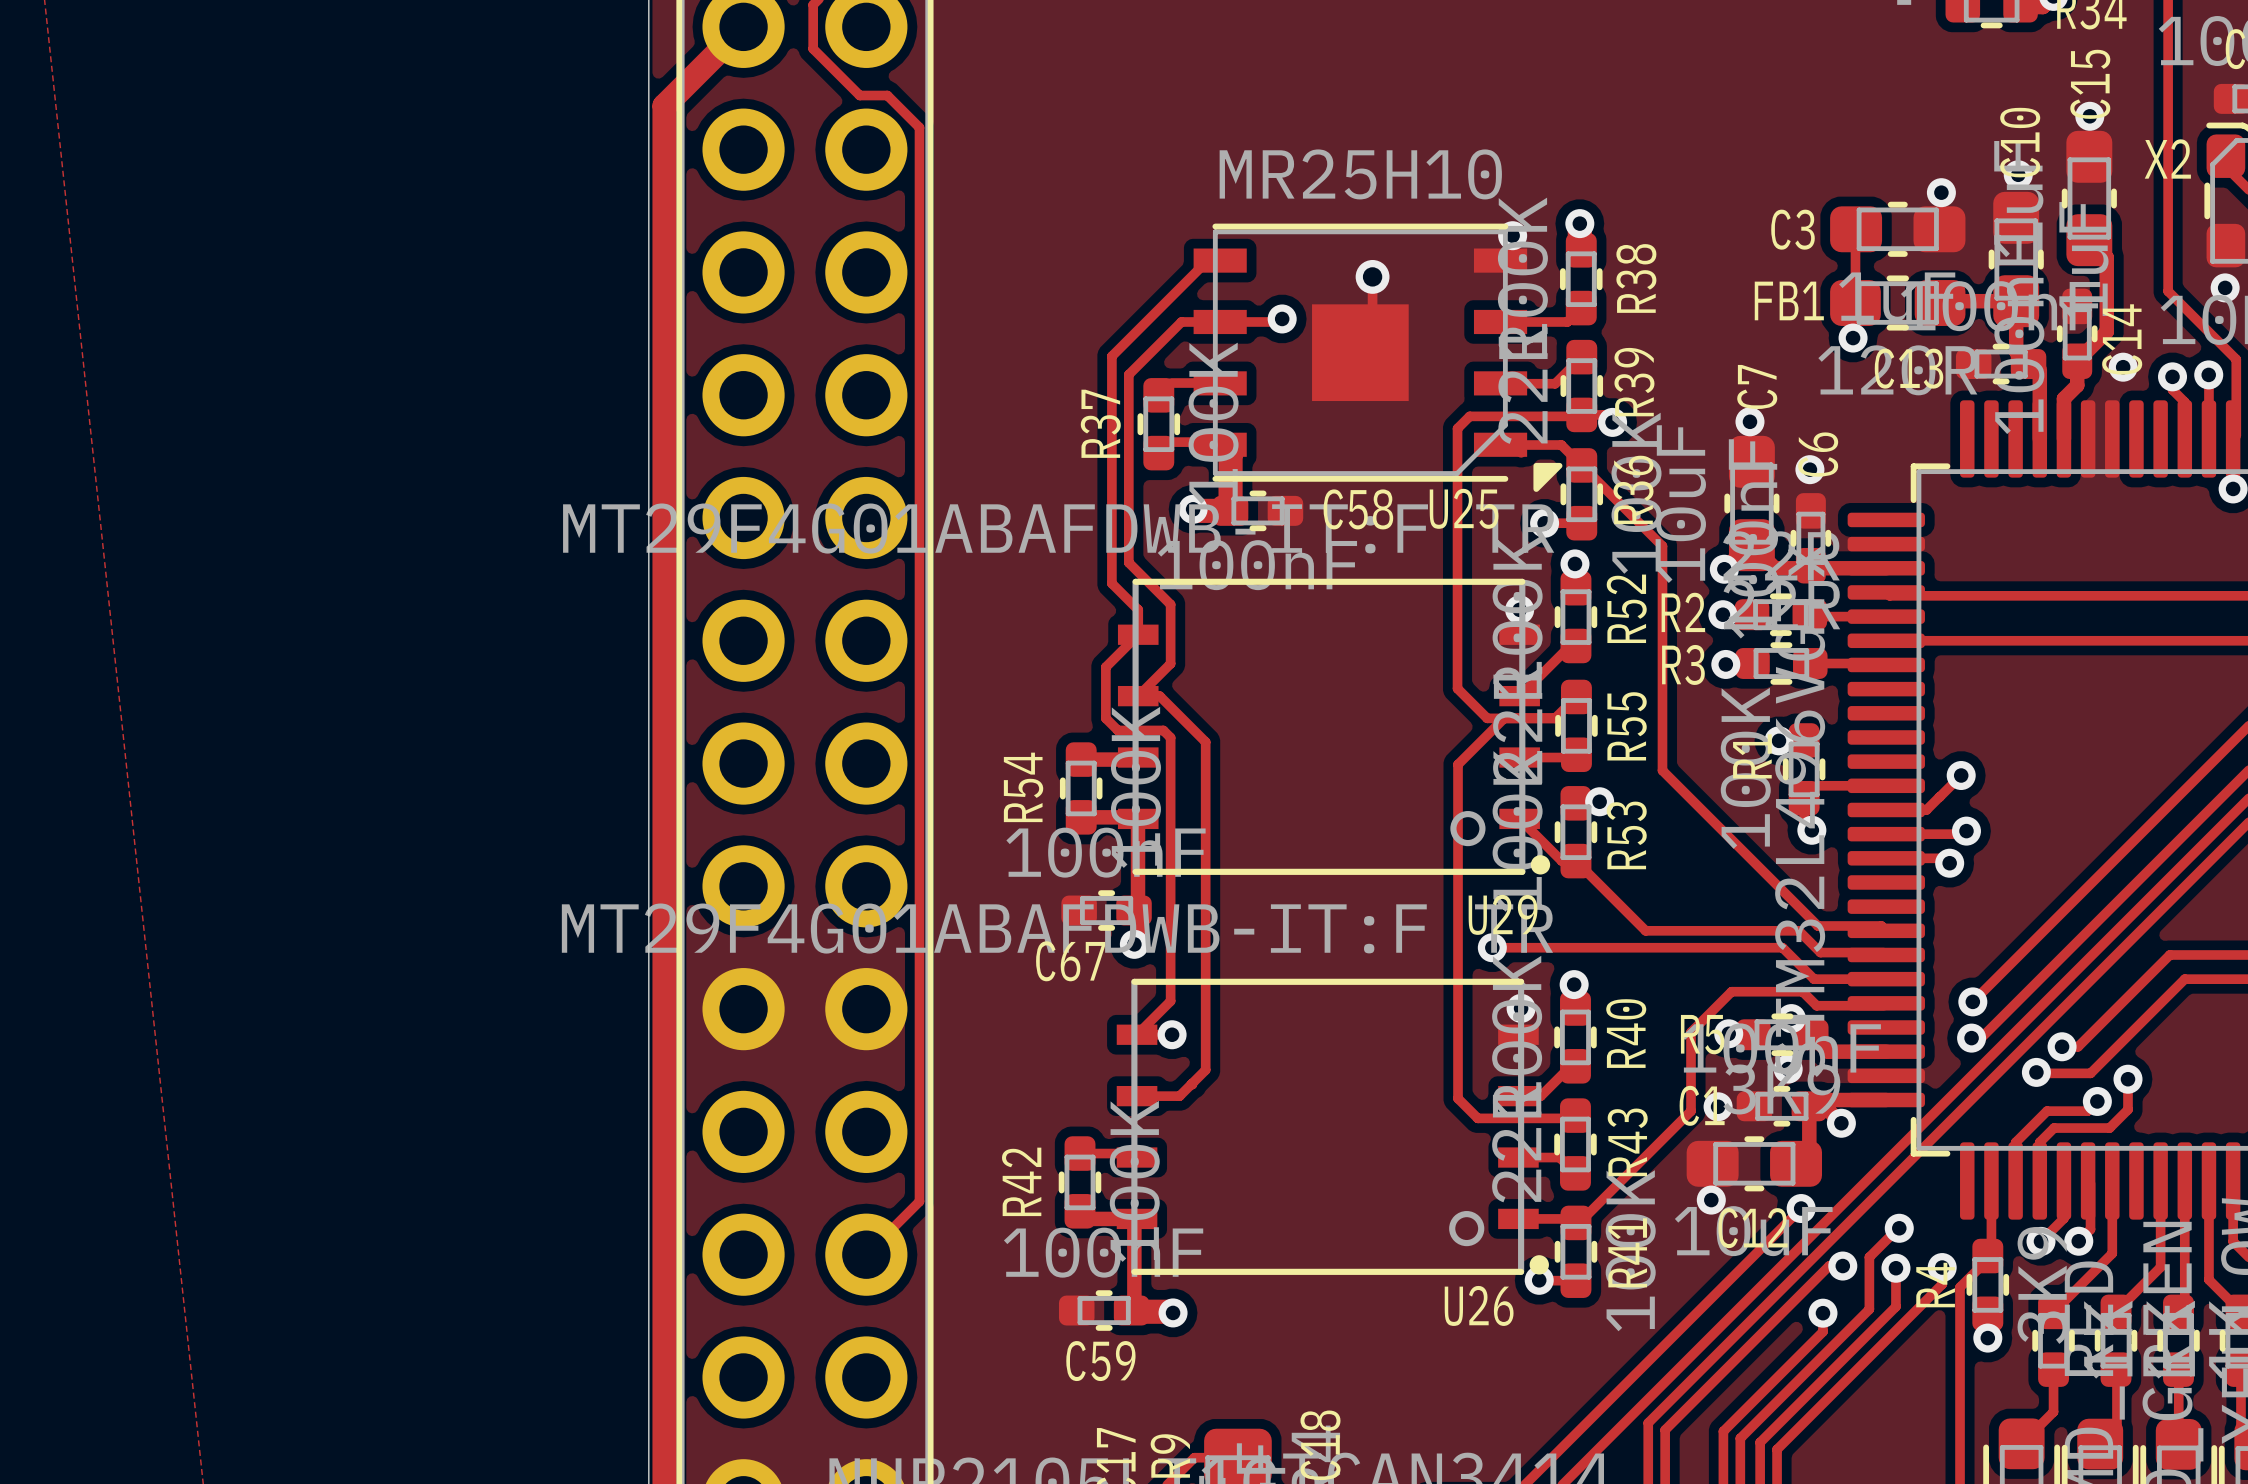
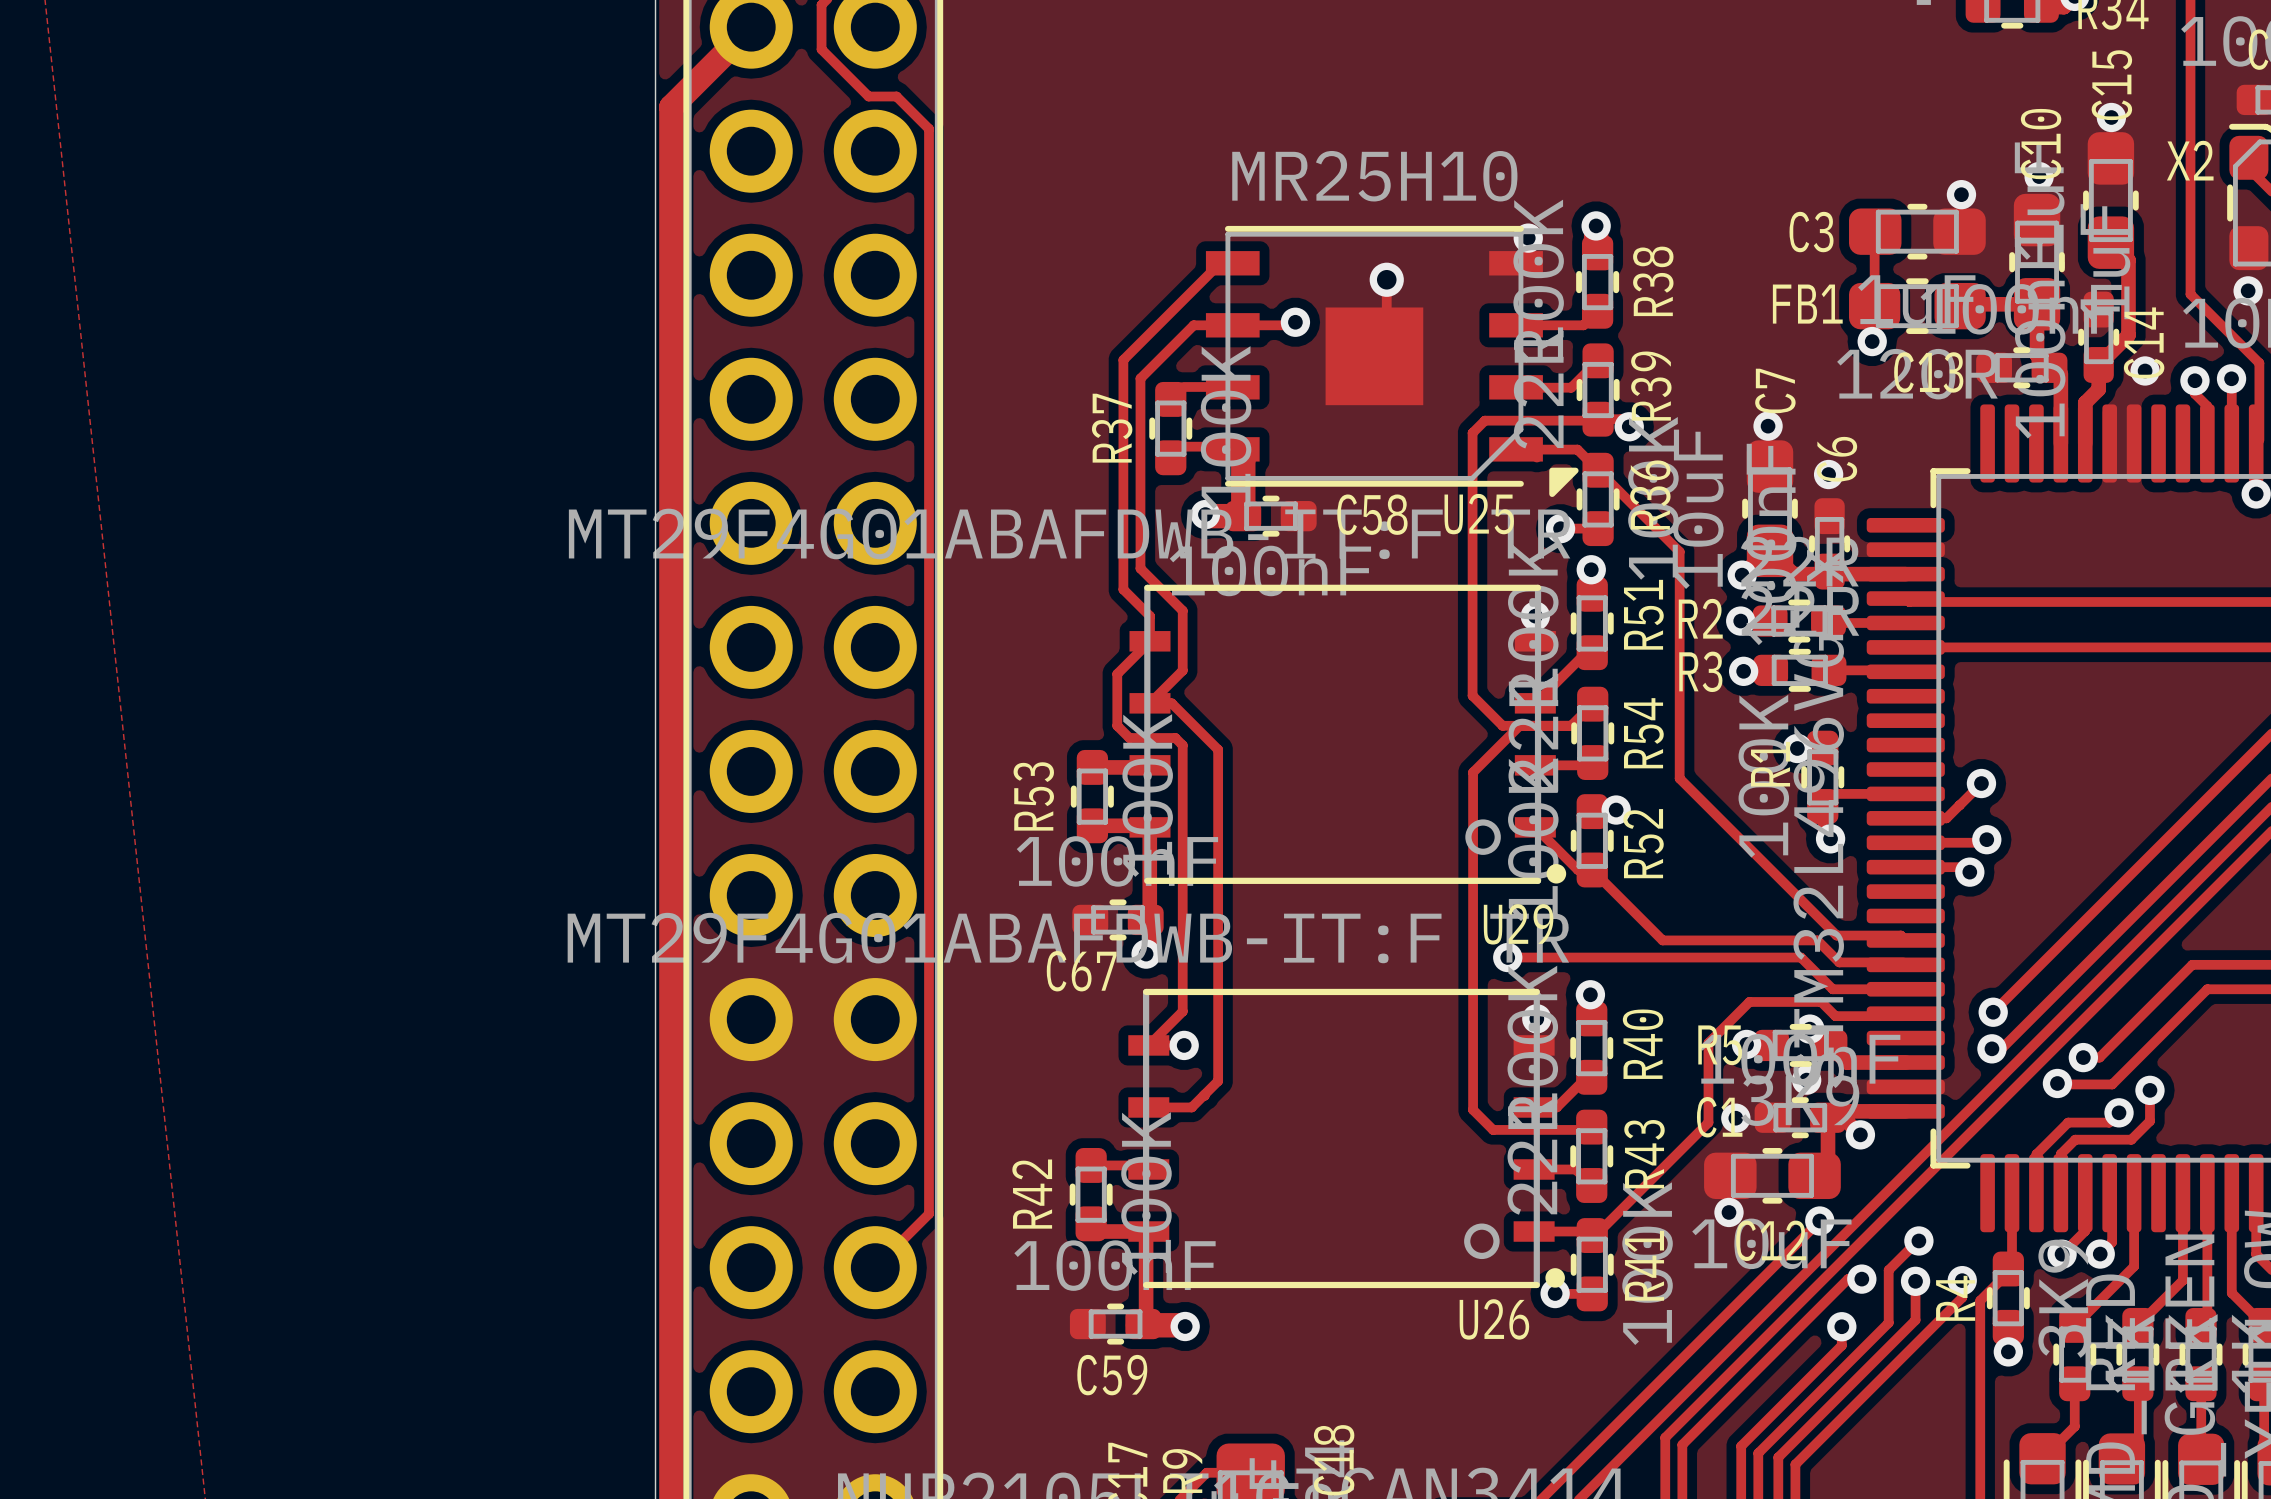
R52 name: R52 (1626, 608) -> R51 (1643, 614)
R55 name: R55 (1627, 726) -> R54 (1643, 733)
R54 name: R54 (1023, 787) -> R53 (1033, 796)
R53 name: R53 (1626, 835) -> R52 (1643, 843)

